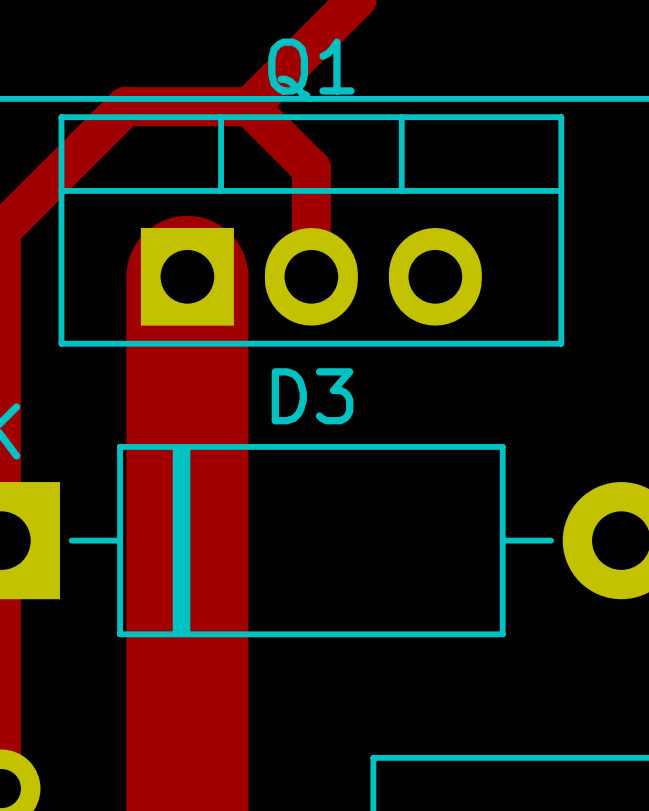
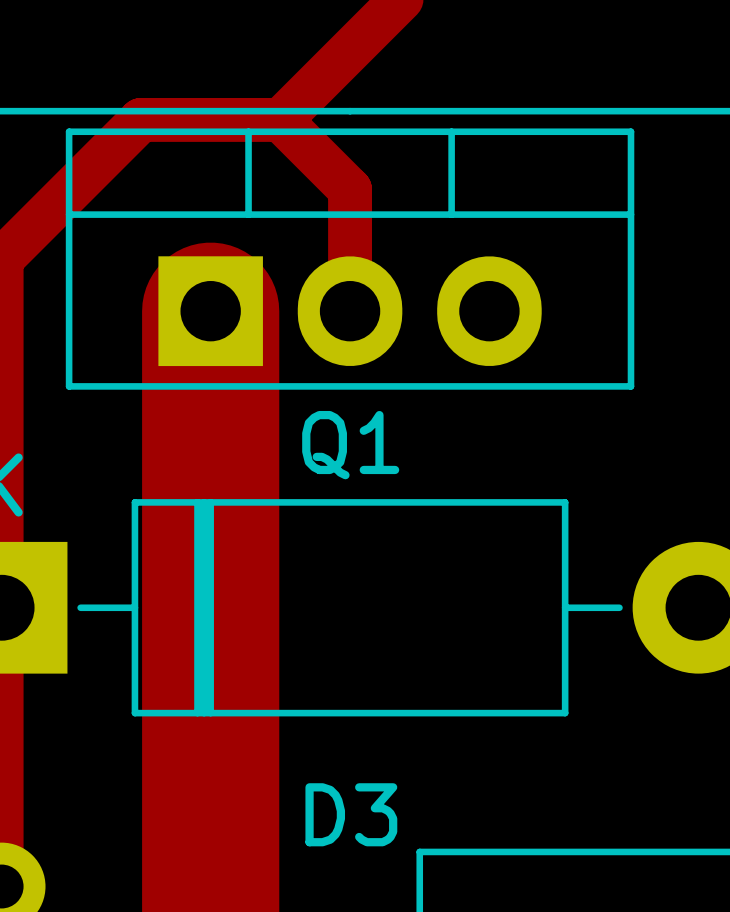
Q1 name position: Q1 (311, 68) -> Q1 (350, 445)
D3 name position: D3 (312, 396) -> D3 (351, 814)

